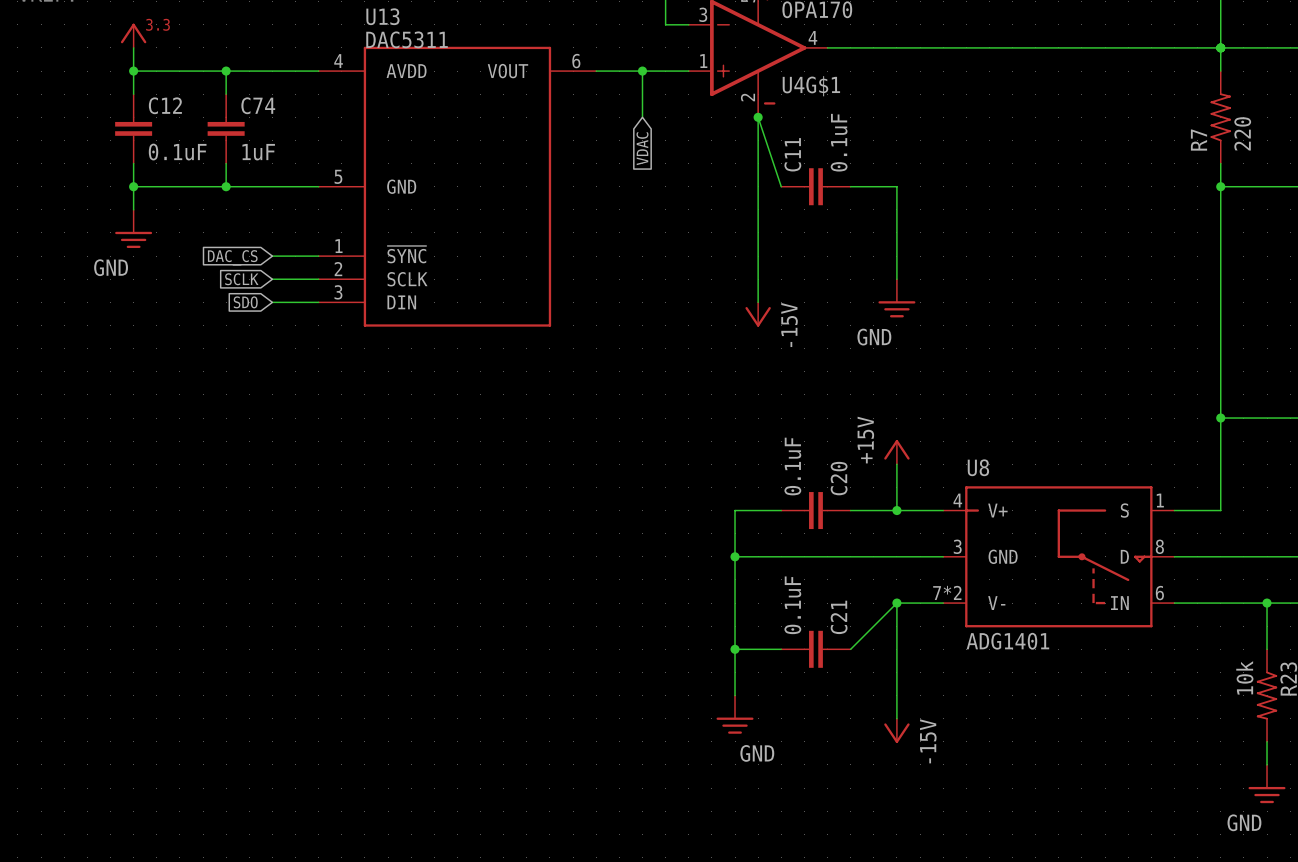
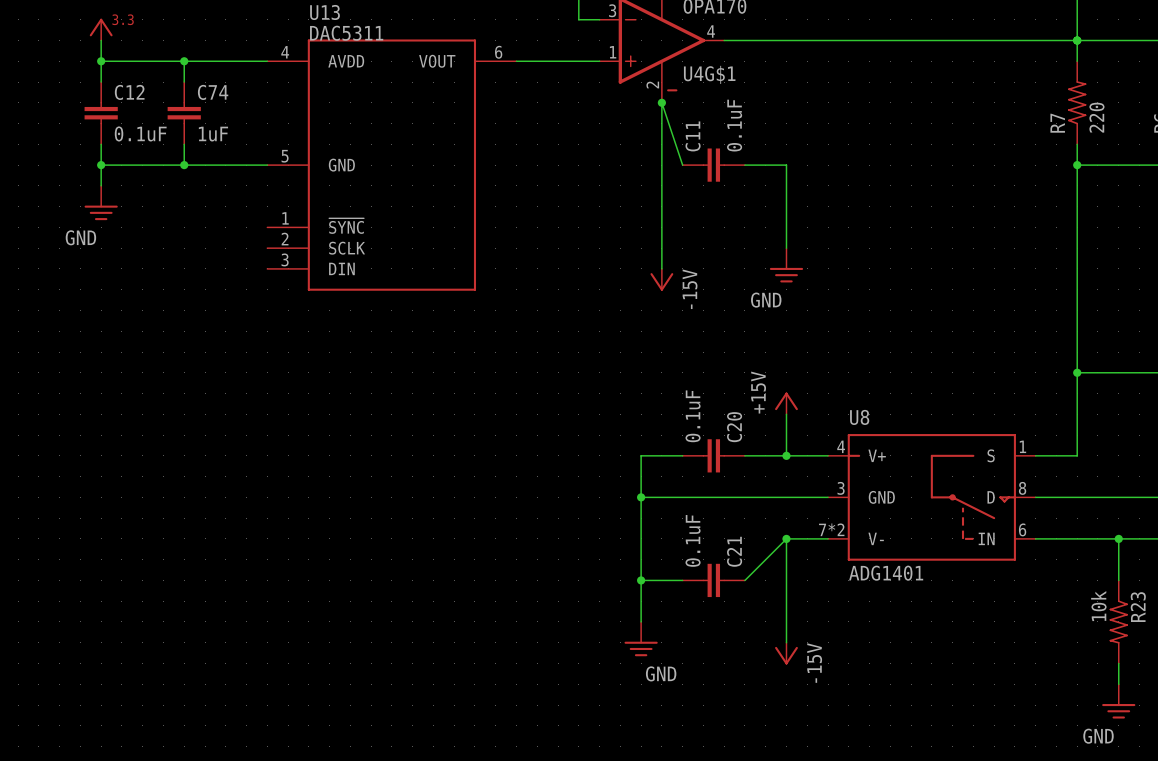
wire: (642, 71) (642, 117) -> none
junction: (642, 71) -> none
global label: VDAC (642, 148) -> none
wire: (272, 256) (318, 256) -> none
global label: DAC_CS (232, 257) -> none
global label: SCLK (241, 279) -> none
wire: (272, 279) (318, 279) -> none
global label: SDO (245, 302) -> none
wire: (272, 302) (318, 302) -> none

